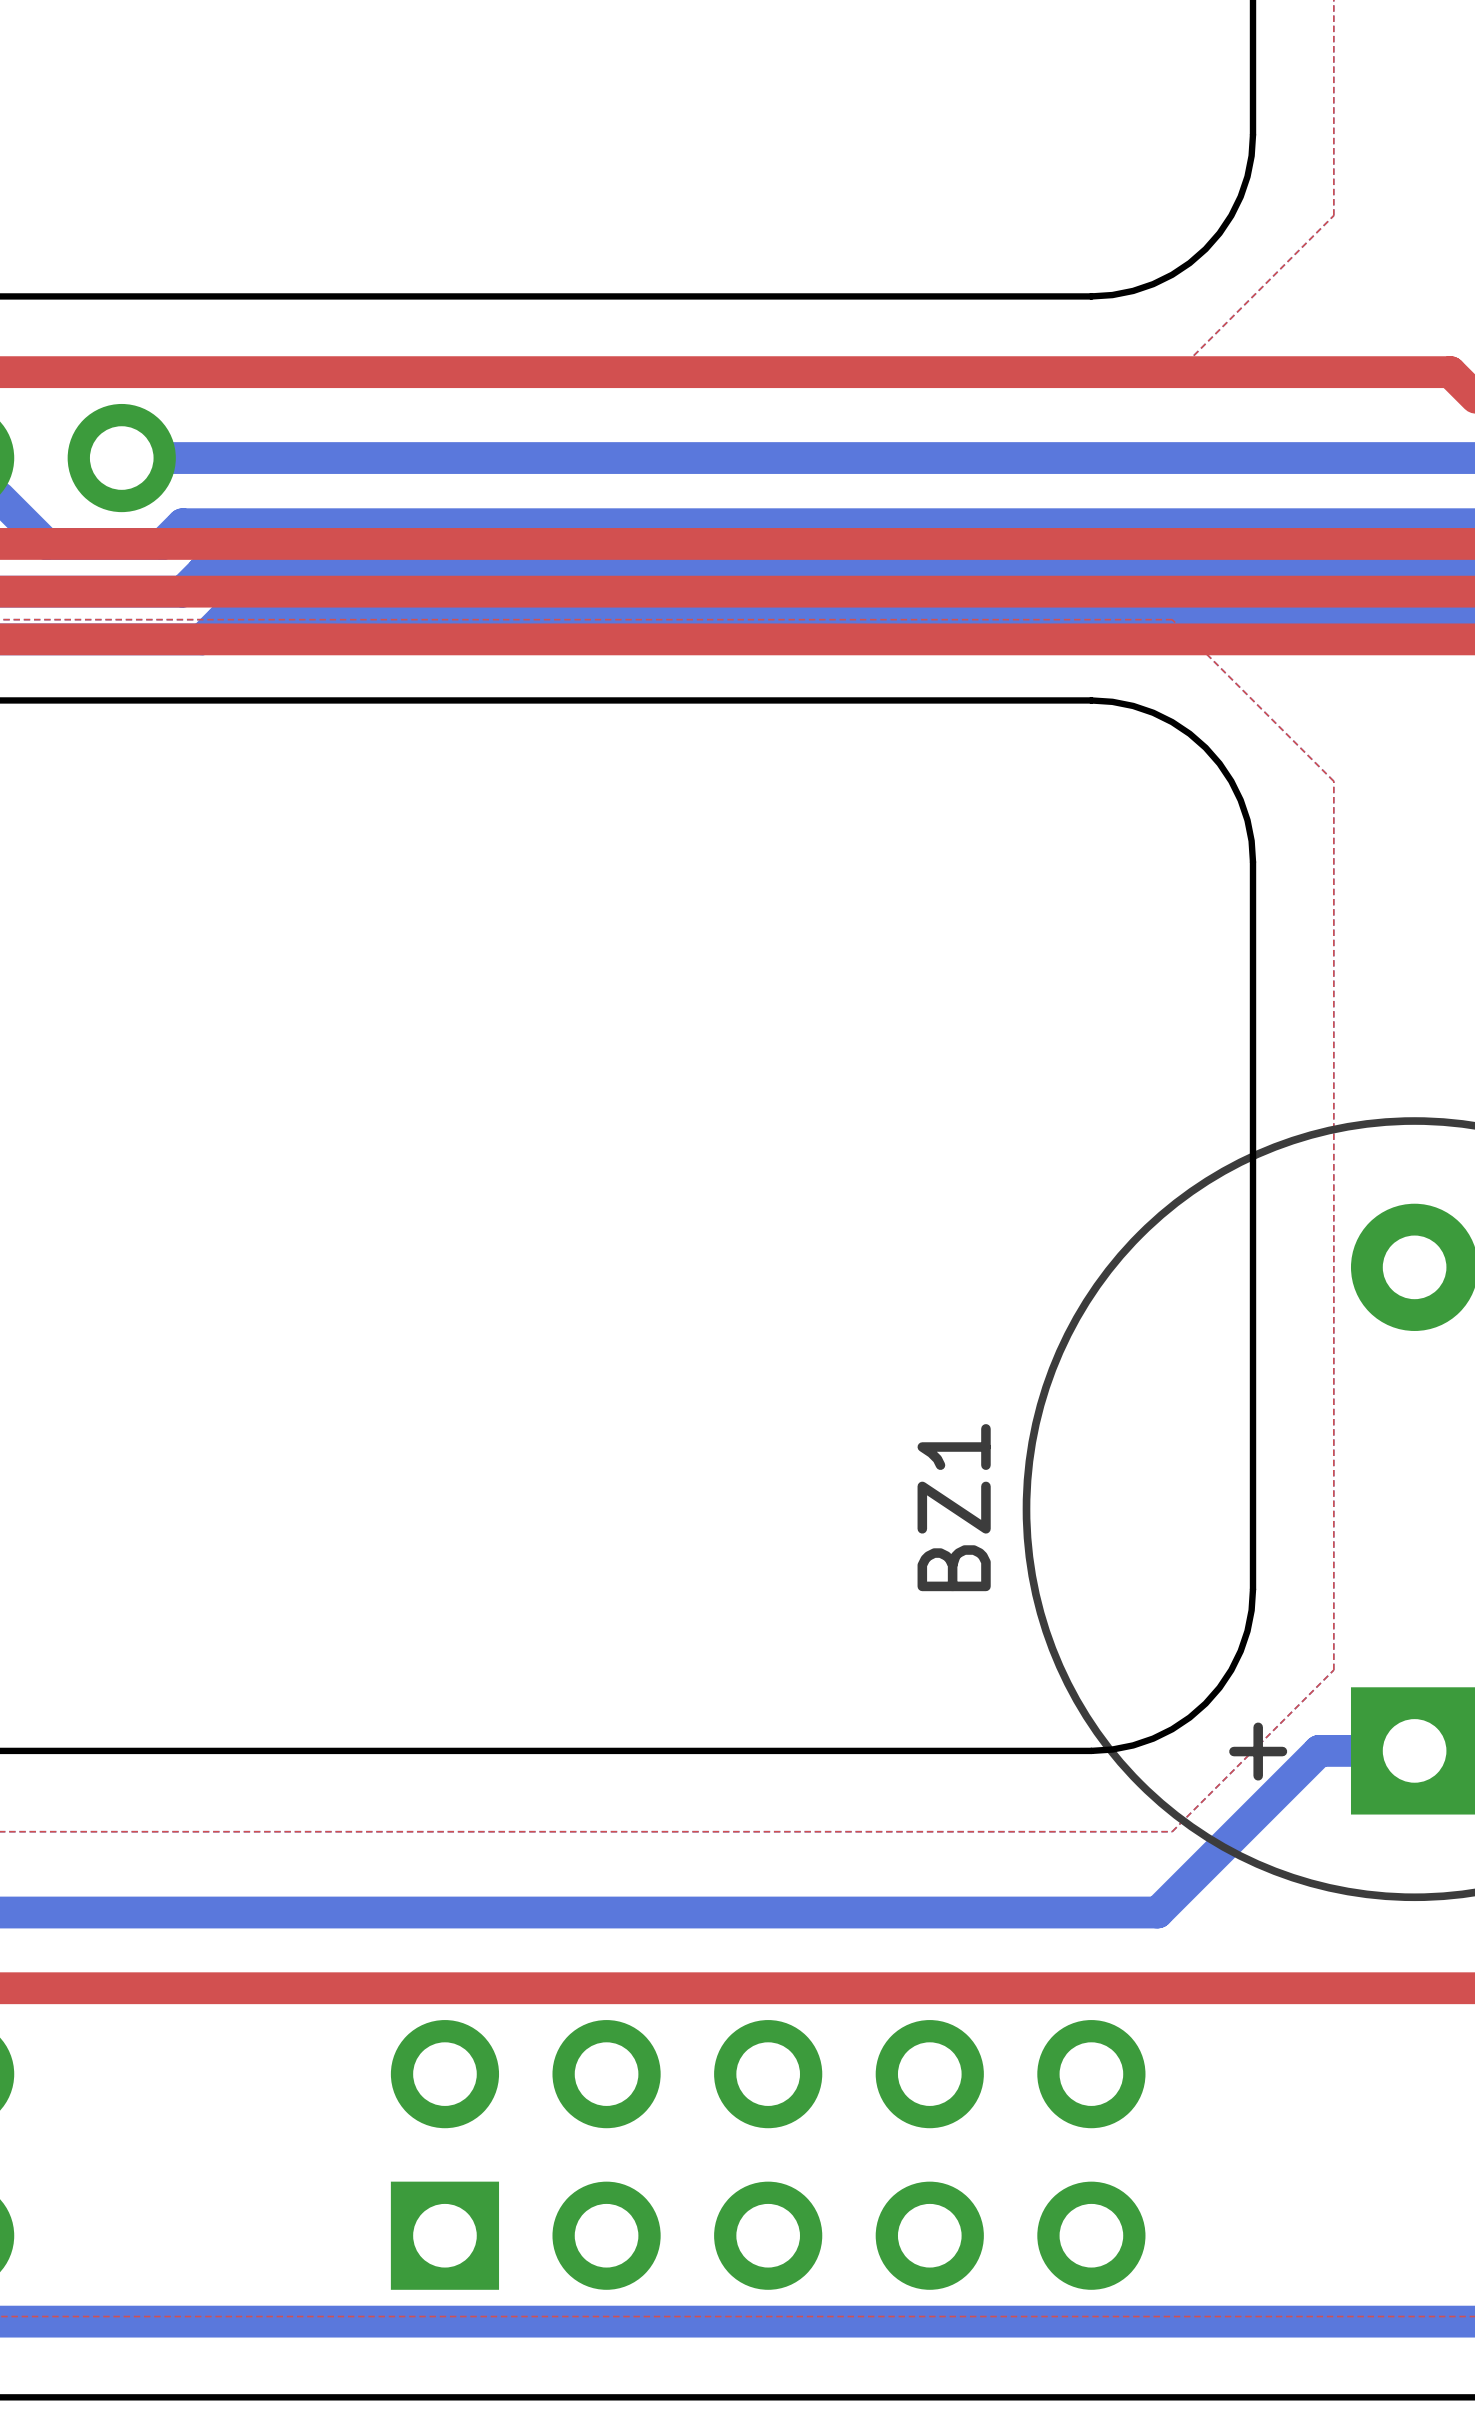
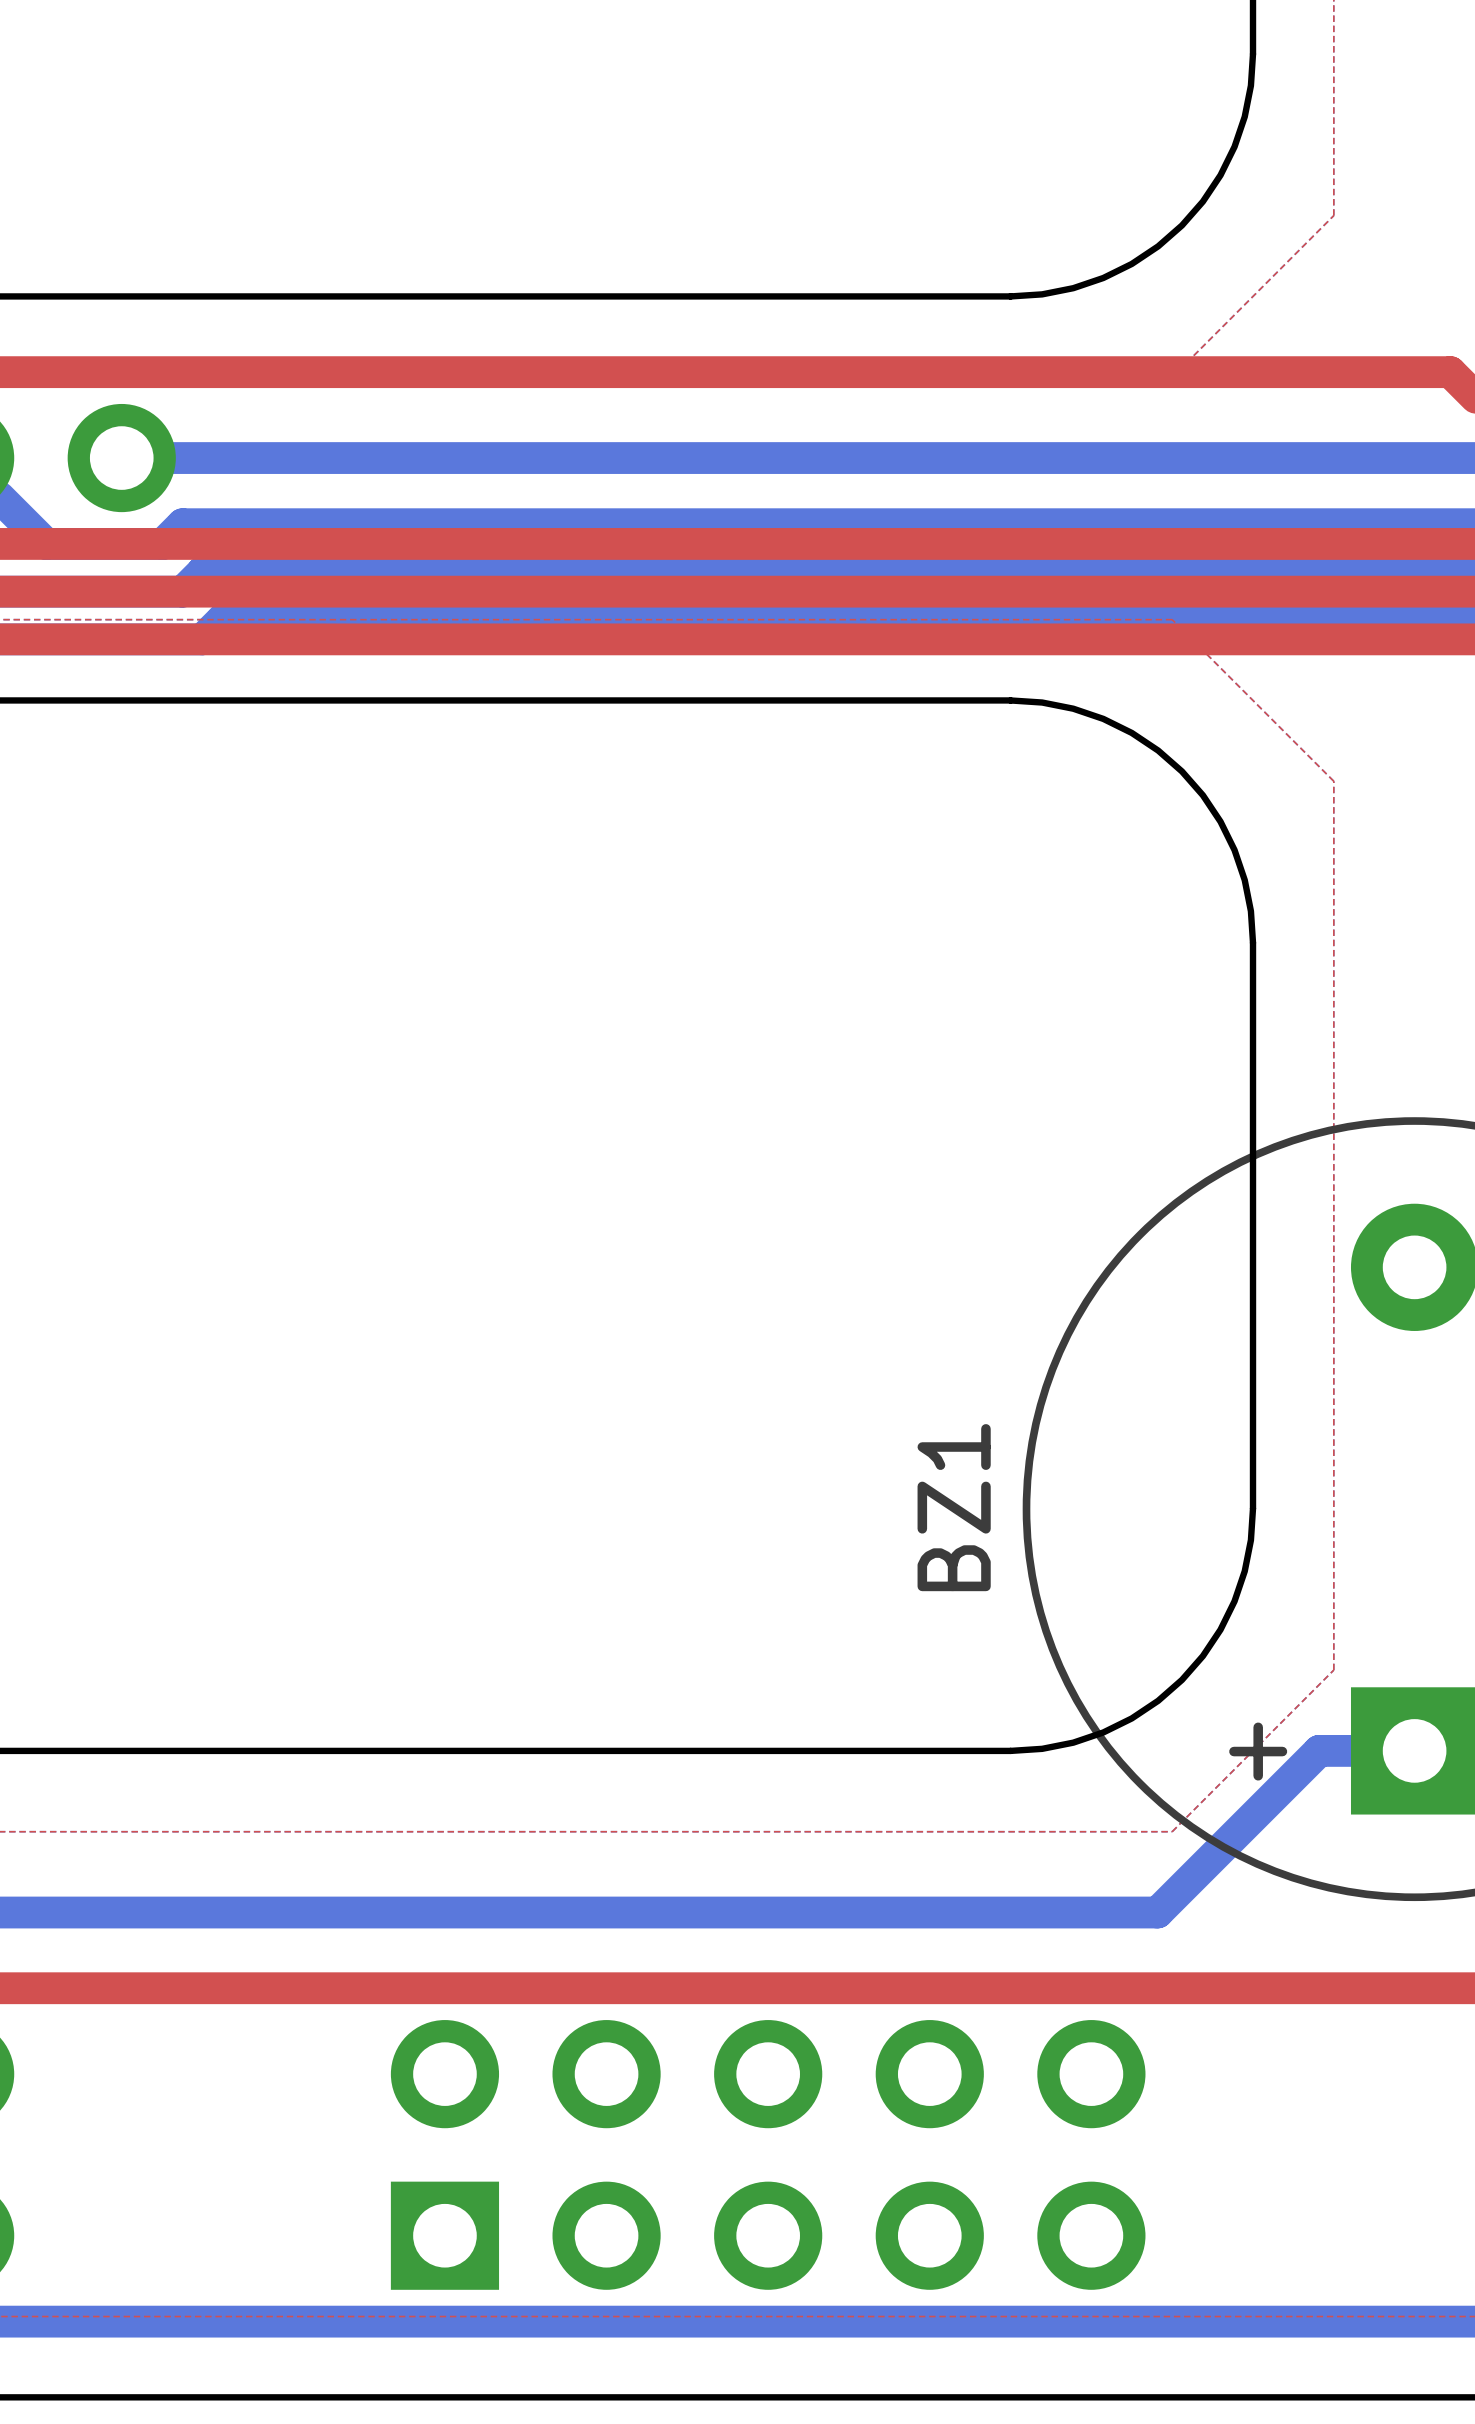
board edge: (1253, 54) (1253, 134) (1247, 176) (1231, 215) (1205, 249) (1172, 274) (1133, 290) (1091, 296) (1010, 296) -> (1253, 54) (1250, 85) (1244, 116) (1234, 146) (1220, 175) (1202, 201) (1182, 225) (1158, 246) (1131, 263) (1103, 277) (1073, 288) (1042, 294) (1010, 296)
board edge: (1010, 700) (1091, 700) (1133, 705) (1172, 722) (1205, 747) (1231, 781) (1247, 820) (1253, 862) (1253, 942) -> (1010, 700) (1042, 702) (1073, 708) (1103, 718) (1131, 732) (1158, 750) (1182, 771) (1202, 795) (1220, 821) (1234, 850) (1244, 880) (1250, 911) (1253, 942)
board edge: (1253, 1508) (1253, 1589) (1247, 1631) (1231, 1670) (1205, 1703) (1172, 1729) (1133, 1745) (1091, 1750) (1010, 1750) -> (1253, 1508) (1250, 1540) (1244, 1571) (1234, 1601) (1220, 1629) (1202, 1656) (1182, 1679) (1158, 1700) (1131, 1718) (1103, 1732) (1073, 1742) (1042, 1748) (1010, 1750)

